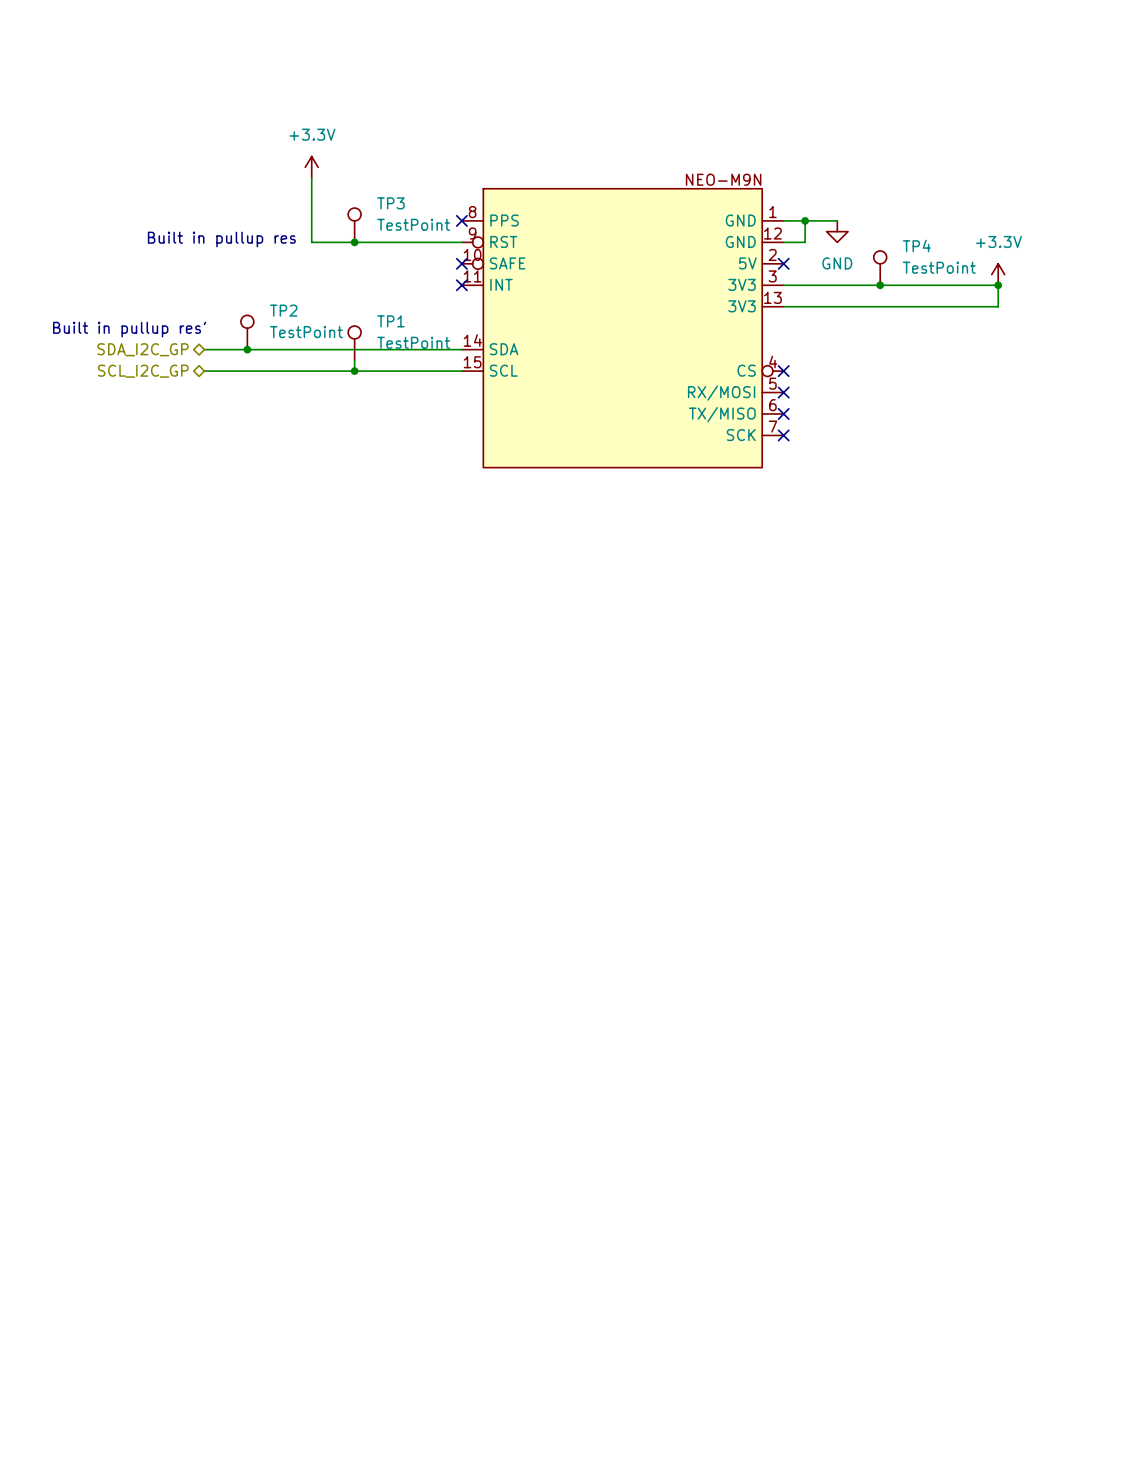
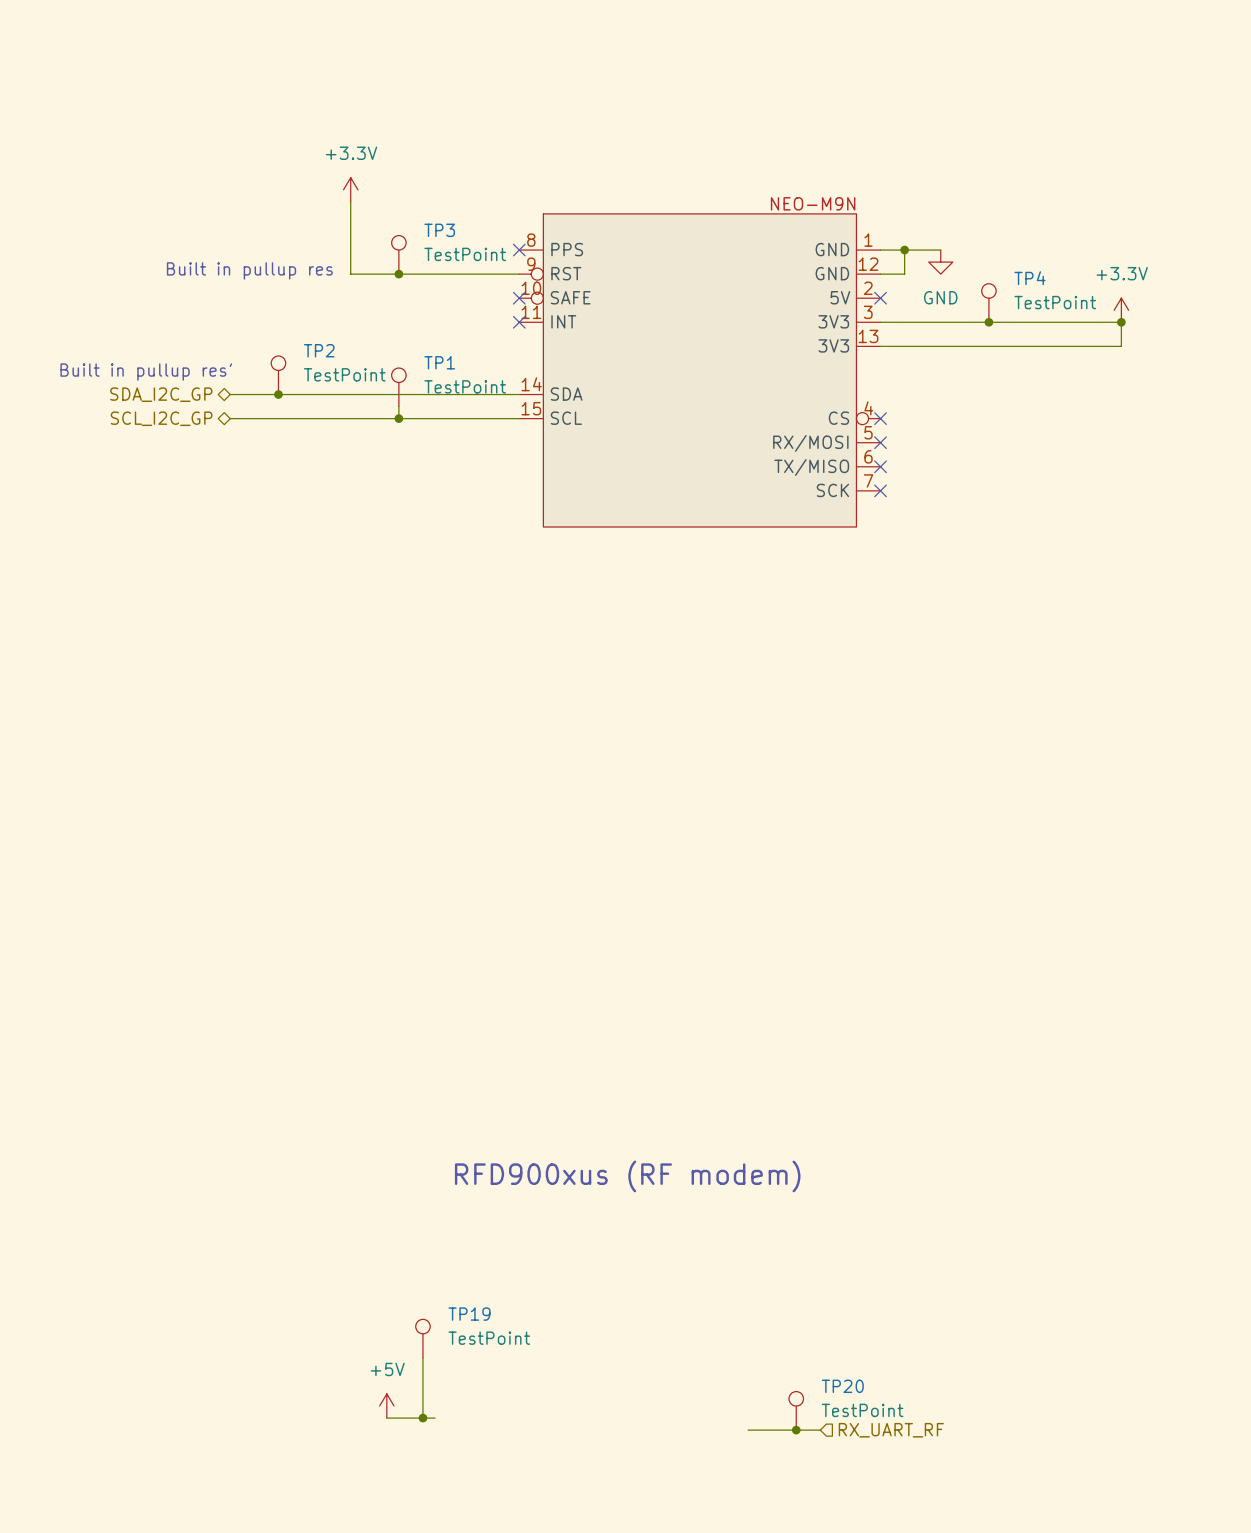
text: none -> RFD900xus (RF modem) (627, 1176)
TP19: none -> TestPoint (422, 1338)
wire: none -> (422, 1357) (422, 1418)
power symbol: none -> +5V (386, 1406)
TP20: none -> TestPoint (796, 1410)
wire: none -> (386, 1418) (435, 1418)
junction: none -> (422, 1418)
wire: none -> (748, 1430) (820, 1430)
junction: none -> (796, 1430)
hierarchical label: none -> RX_UART_RF (891, 1430)

